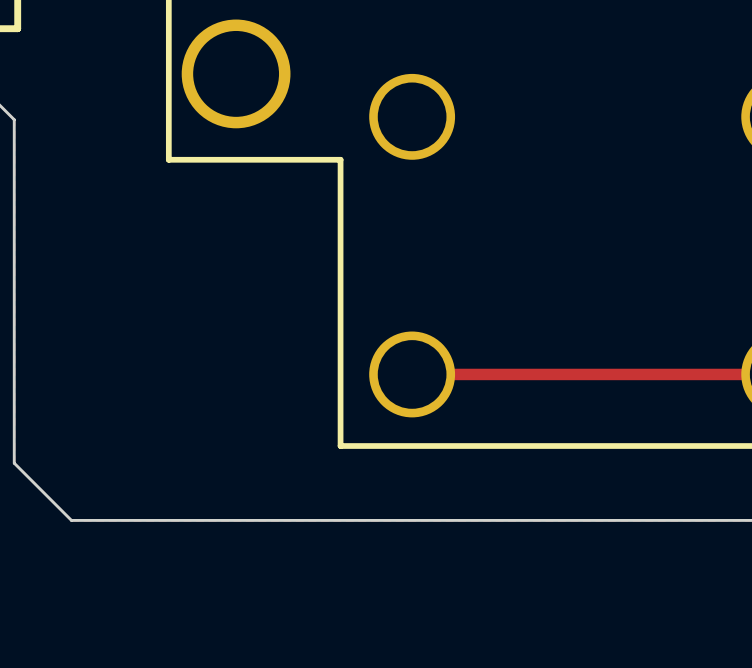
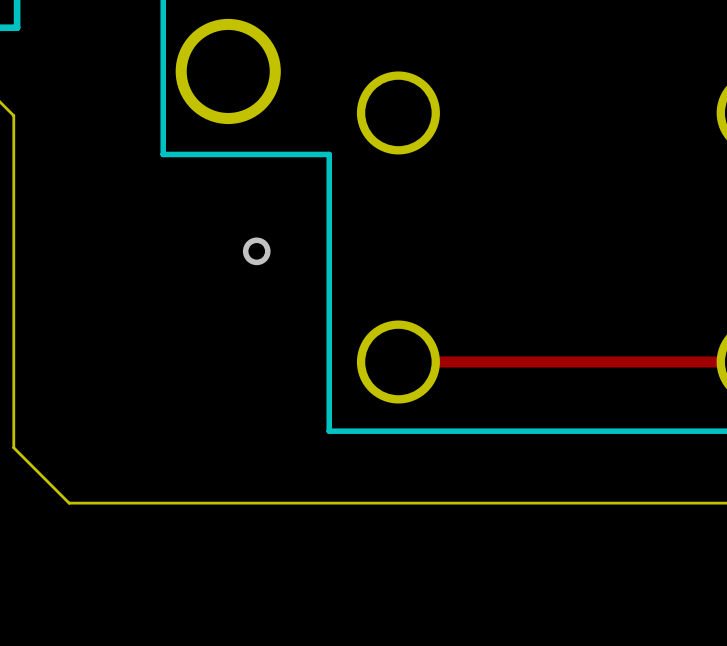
via: none -> (256, 251)

